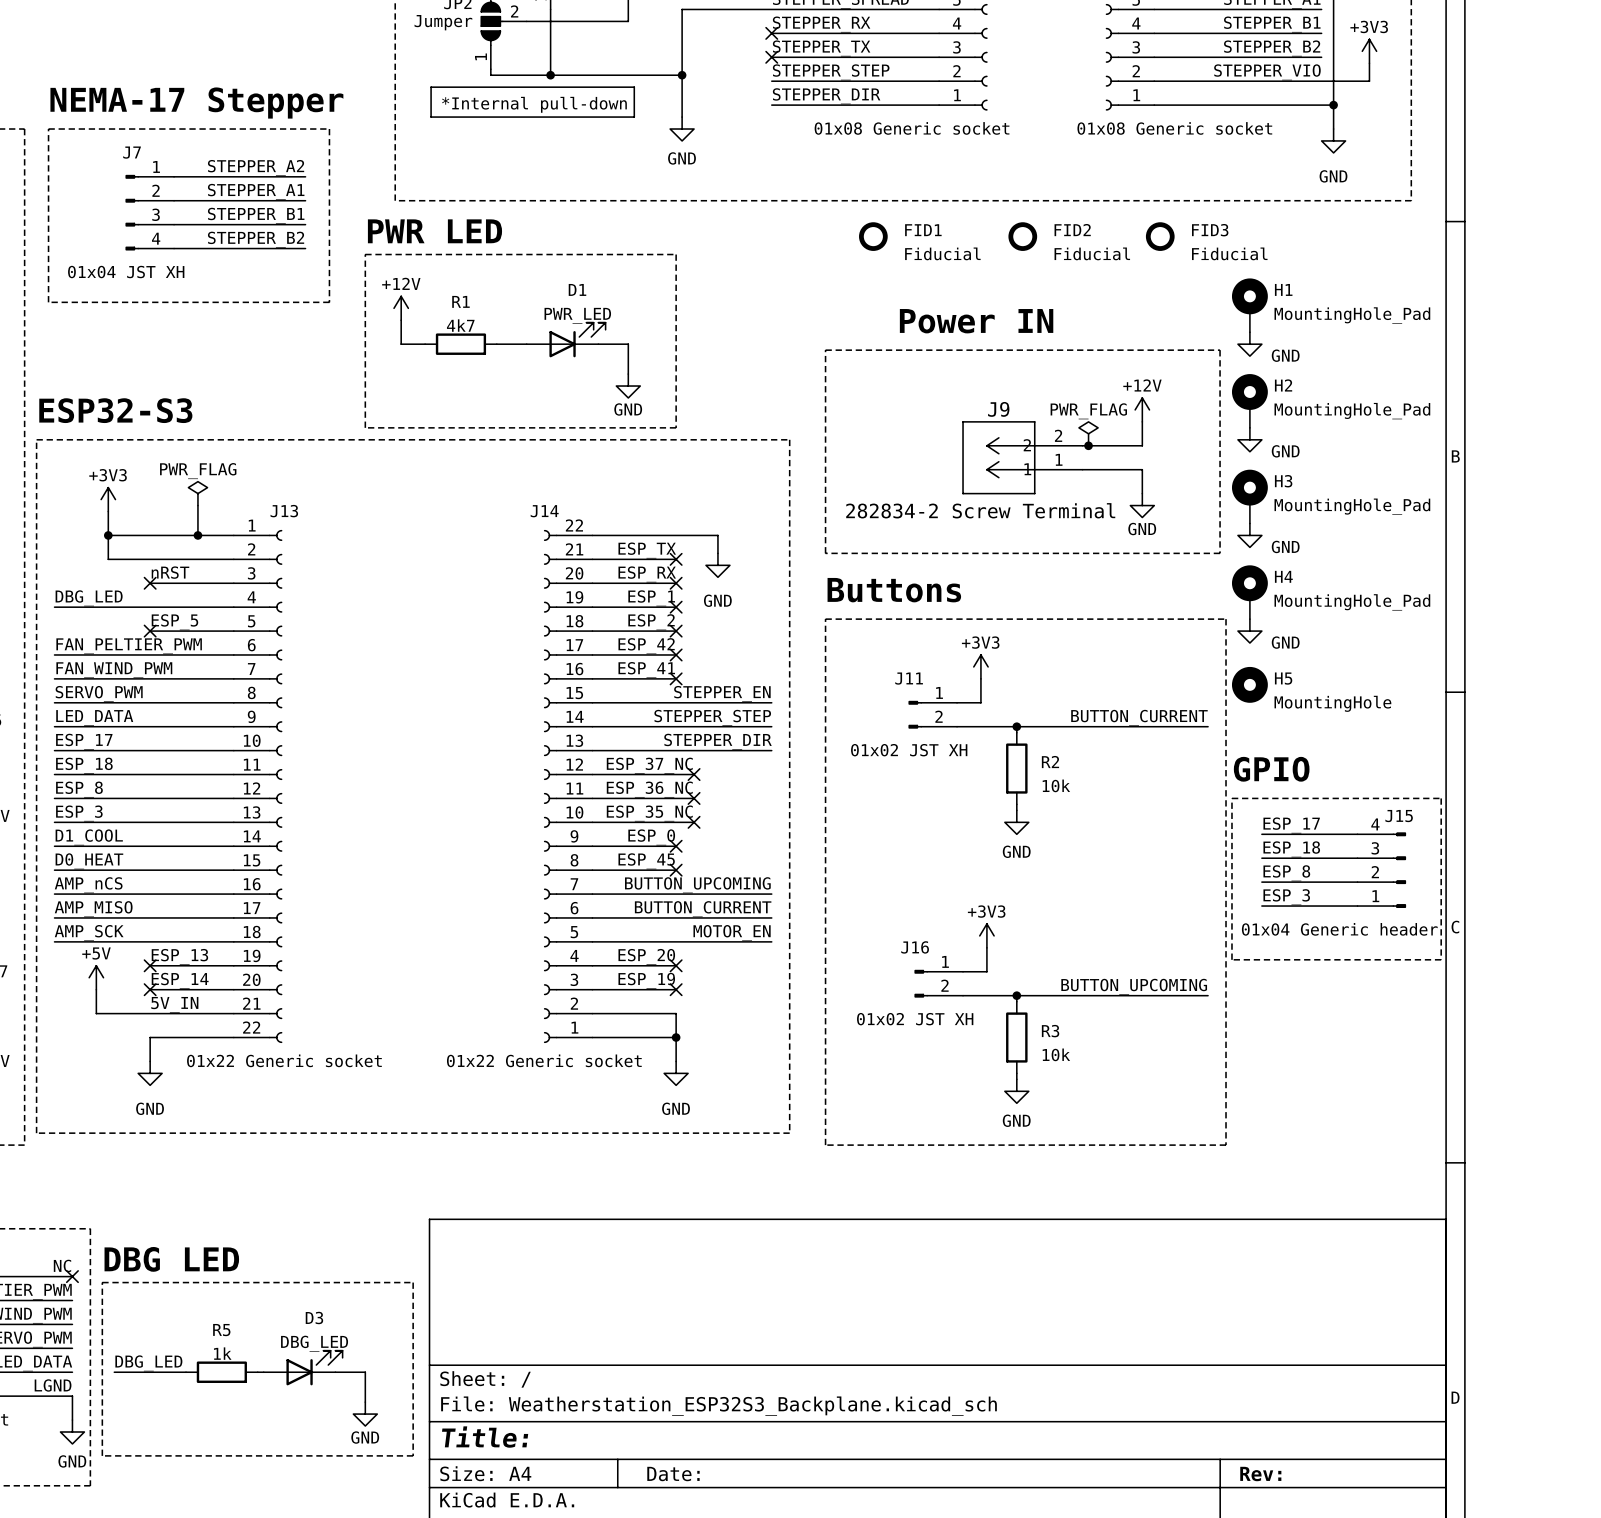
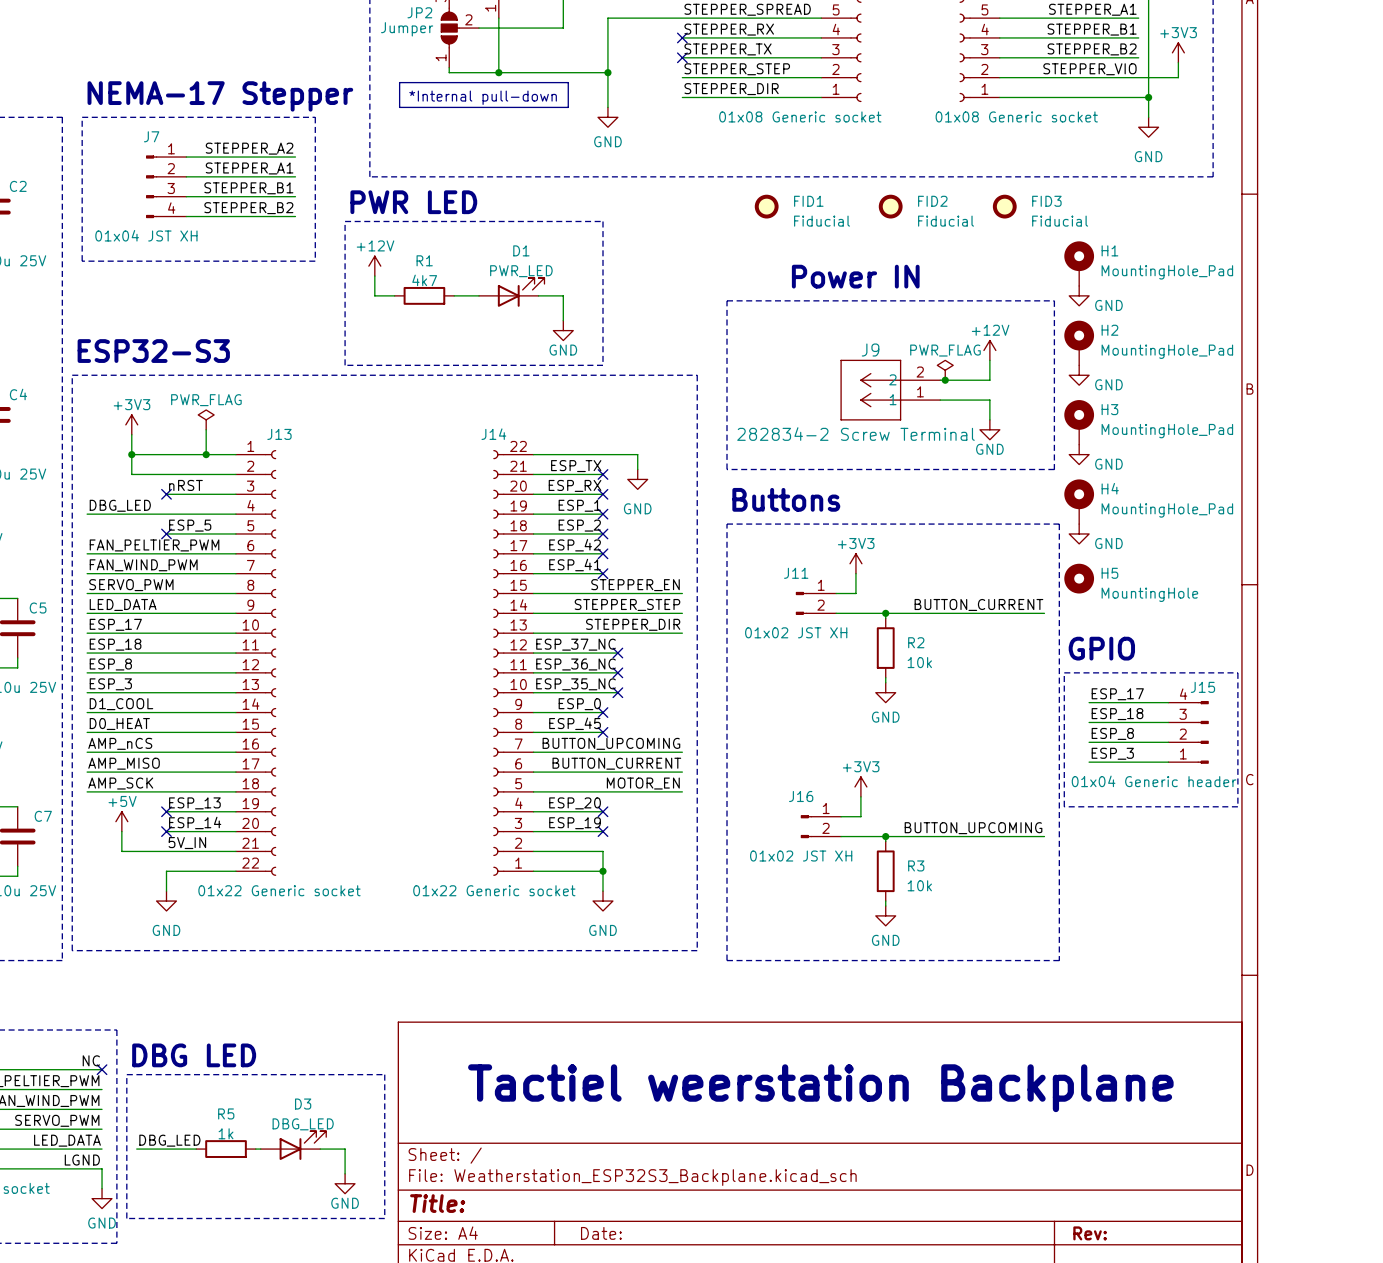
text: none -> Tactiel weerstation Backplane (820, 1088)

